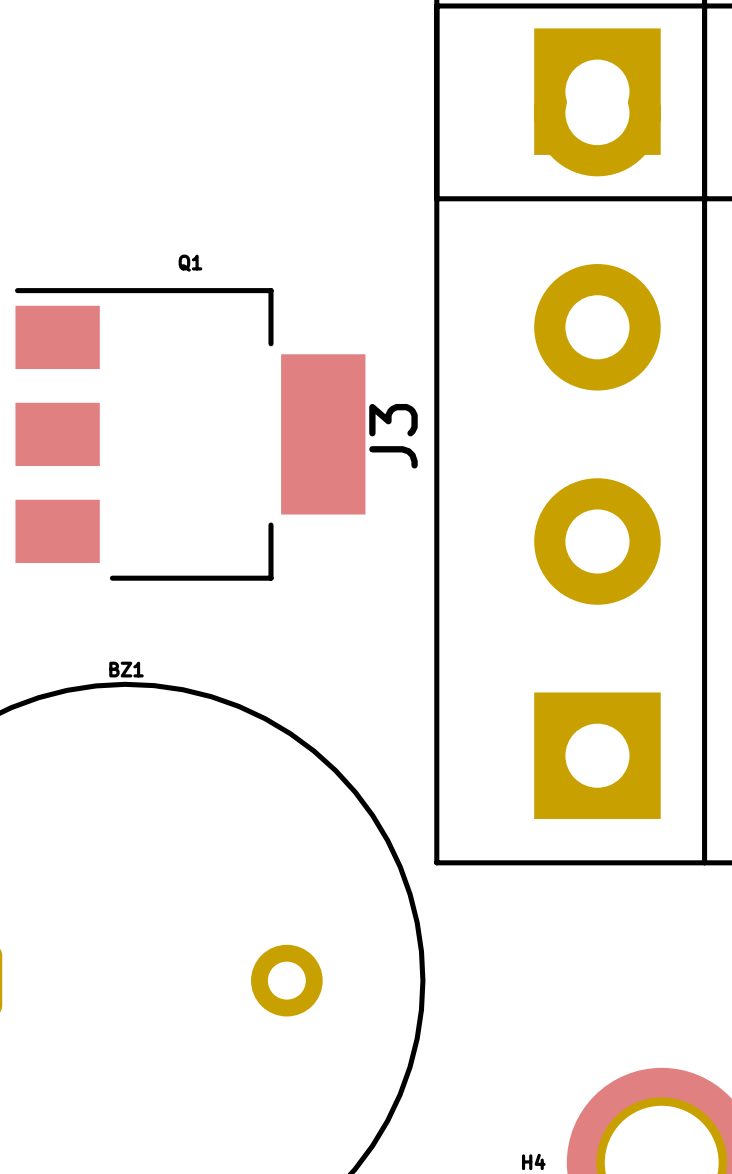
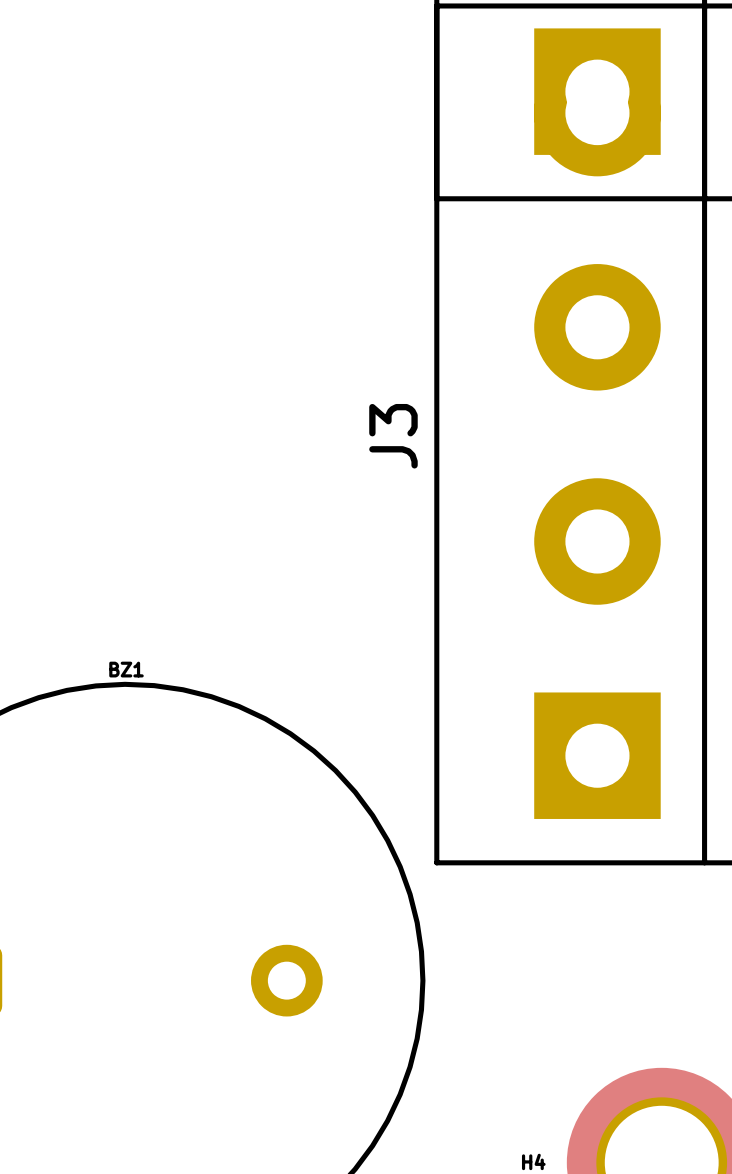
Q1: (190, 434) -> none

